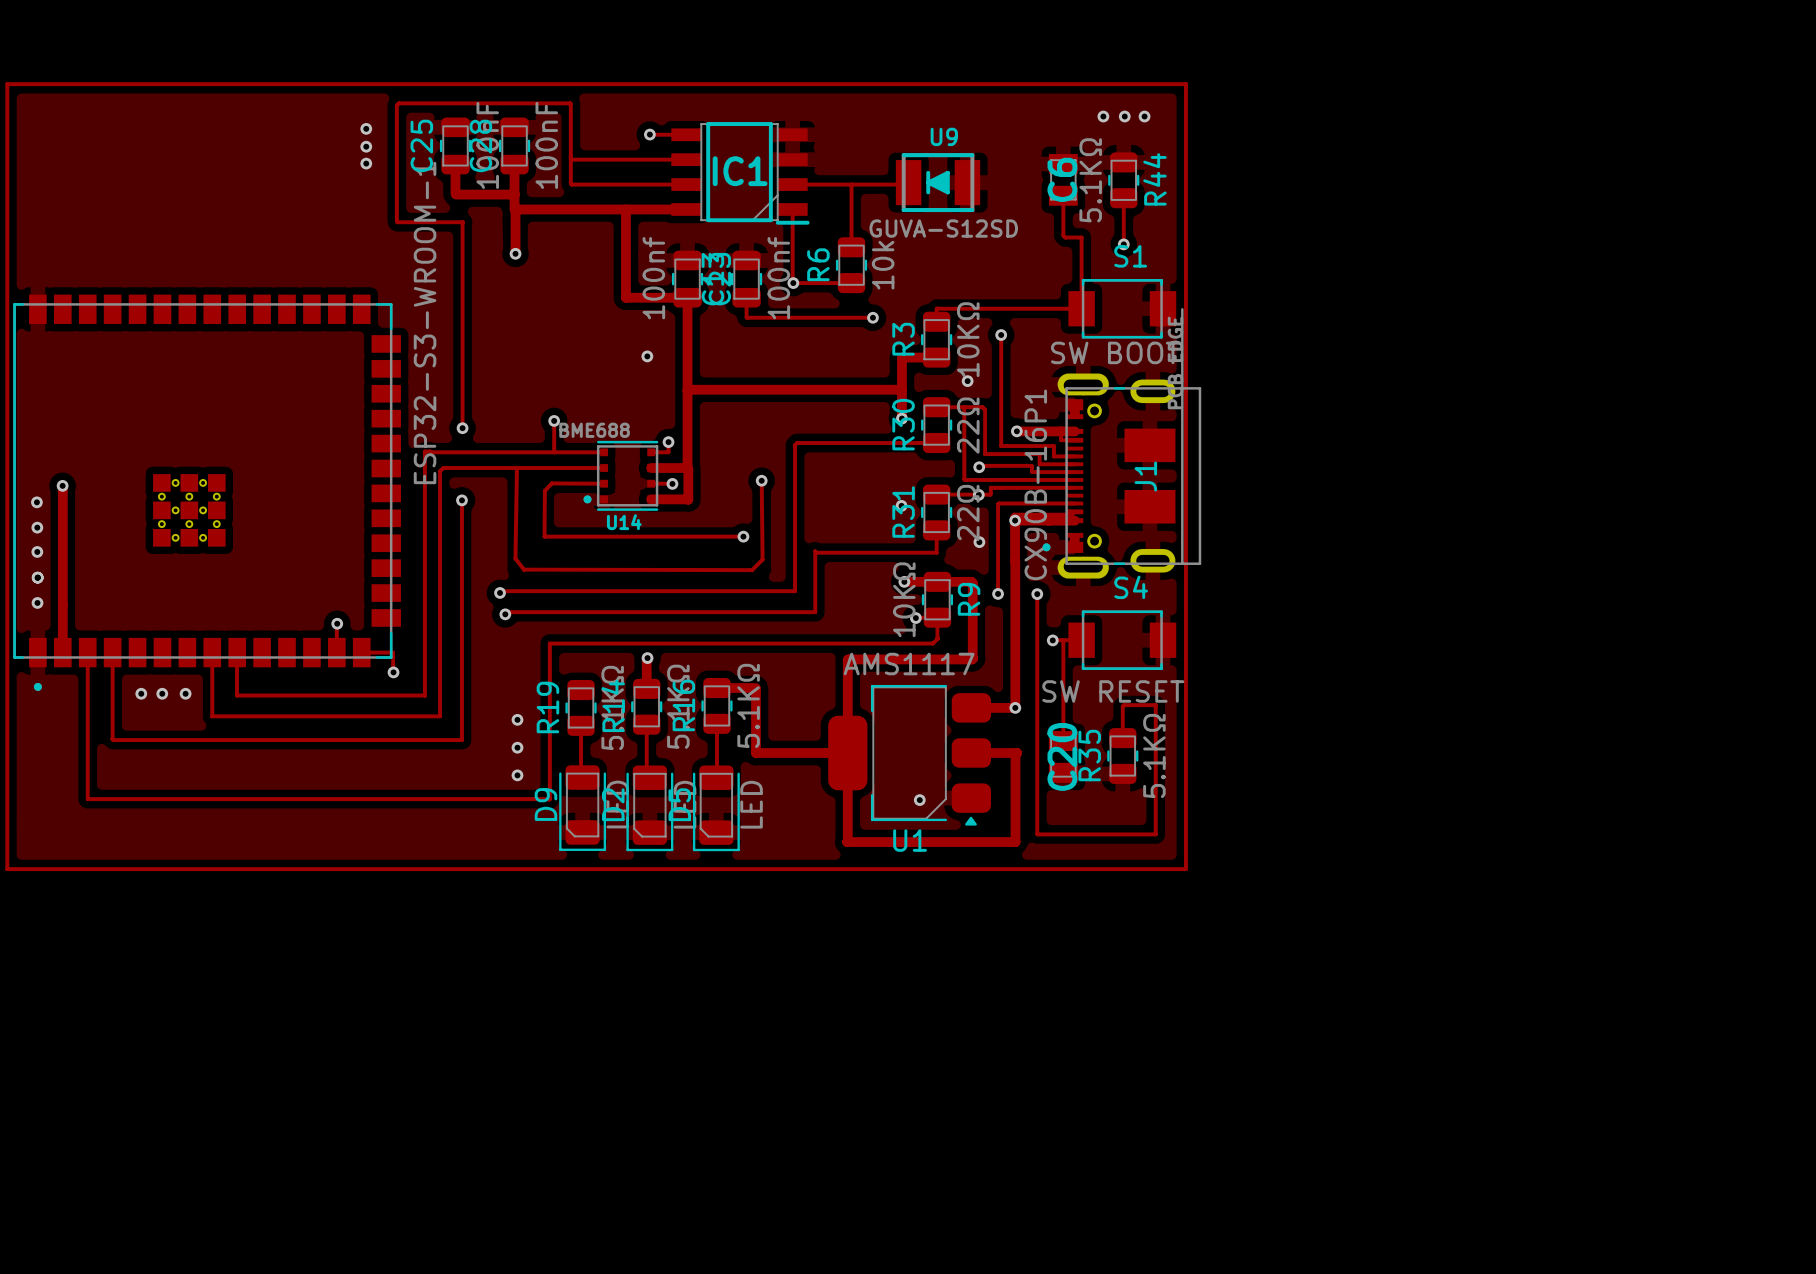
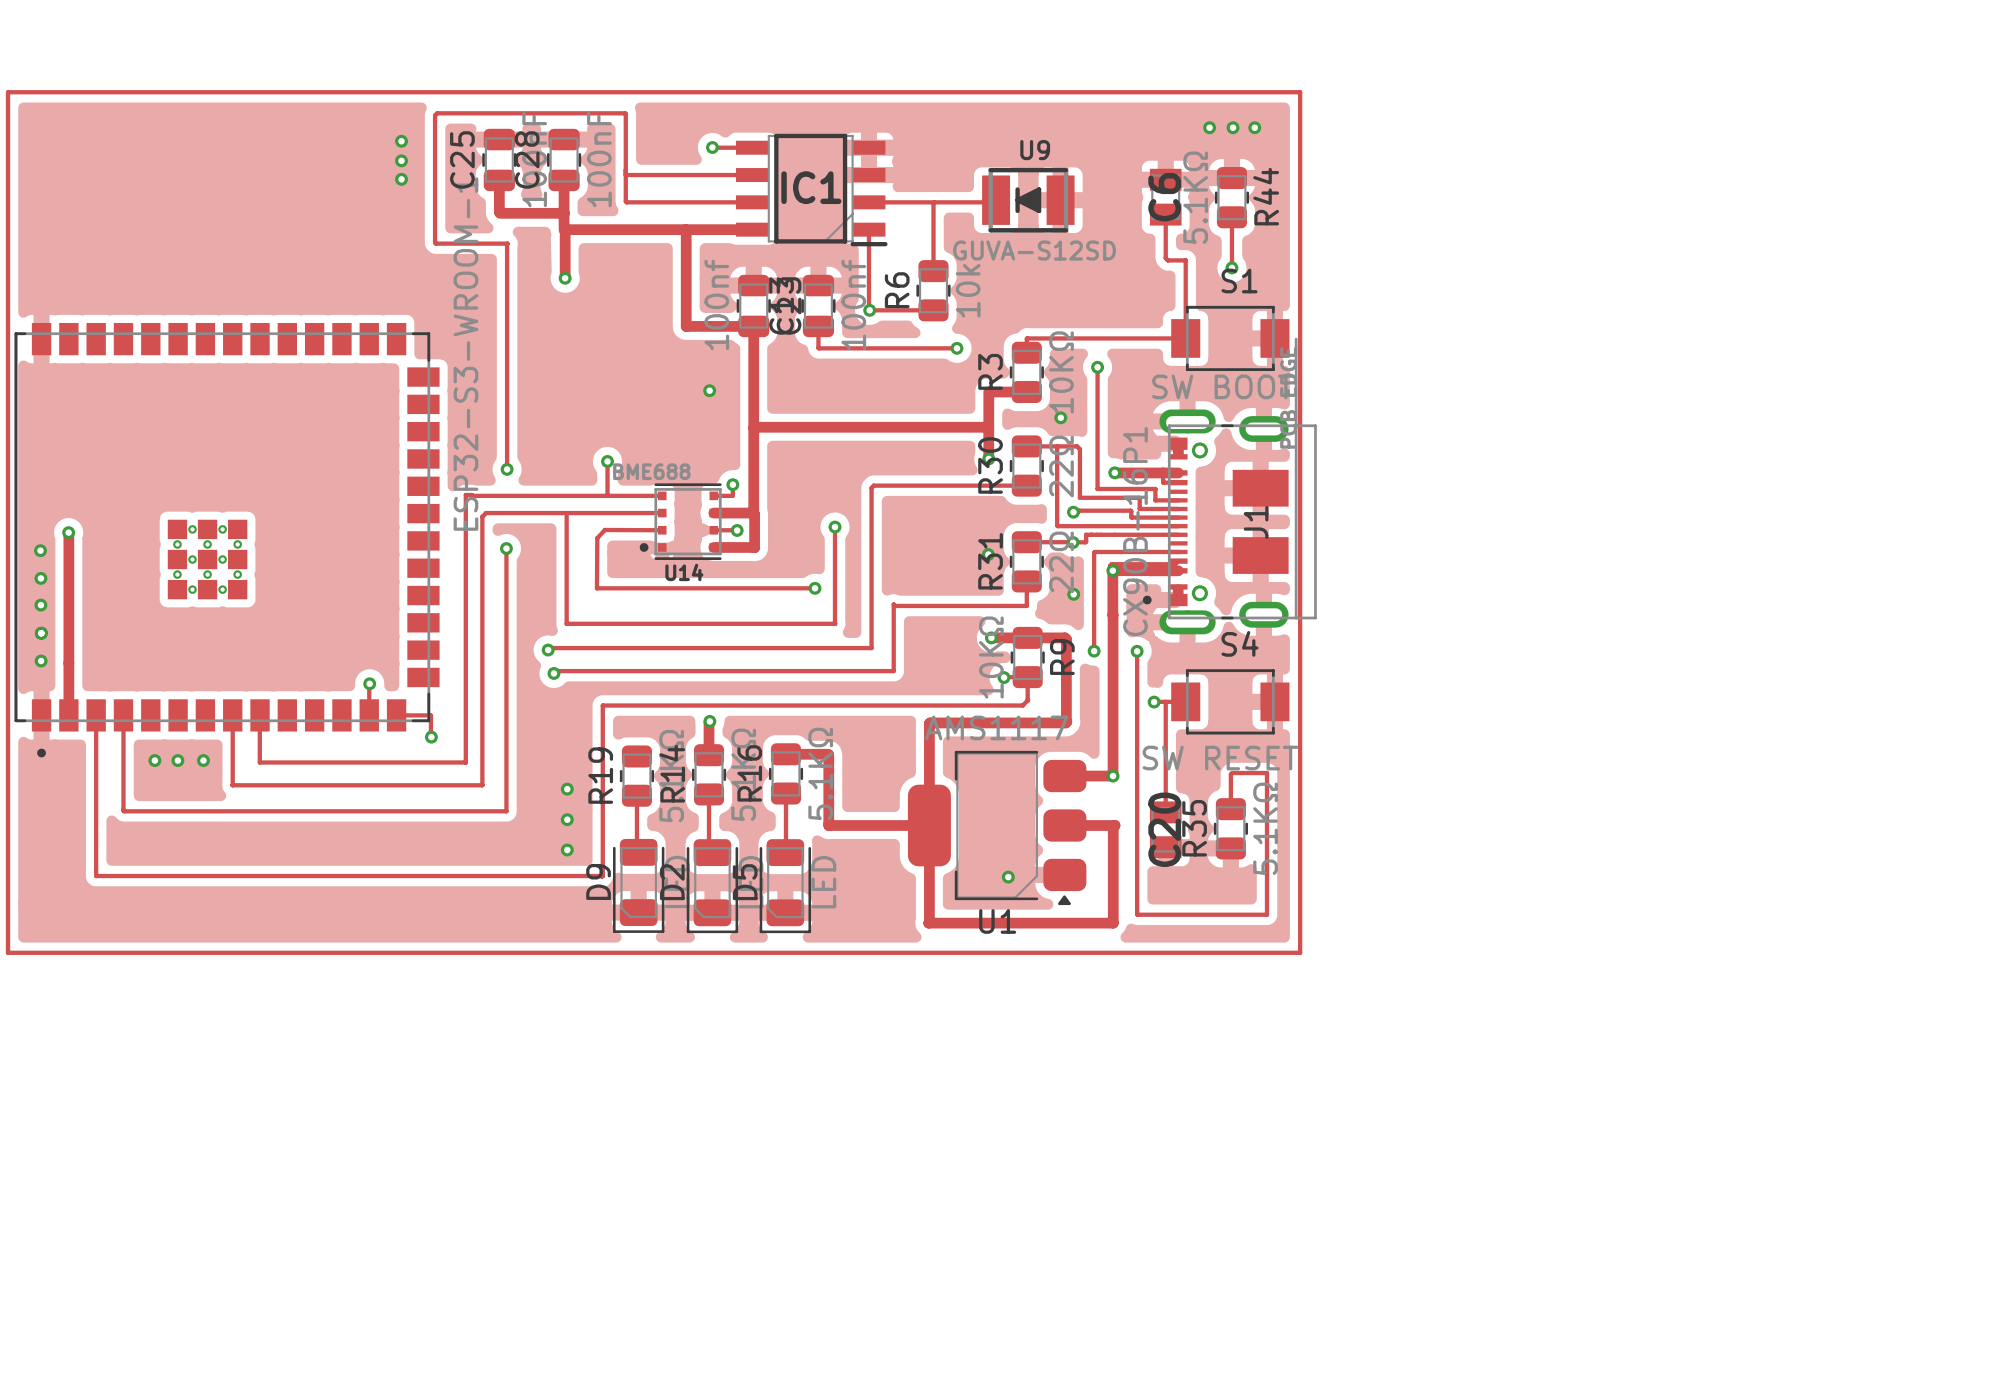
track: (516, 470) (515, 558) (523, 569) (752, 570) (762, 559) (761, 480) -> (566, 516) (566, 623) (835, 623)
track: none -> (835, 527) (835, 623)

